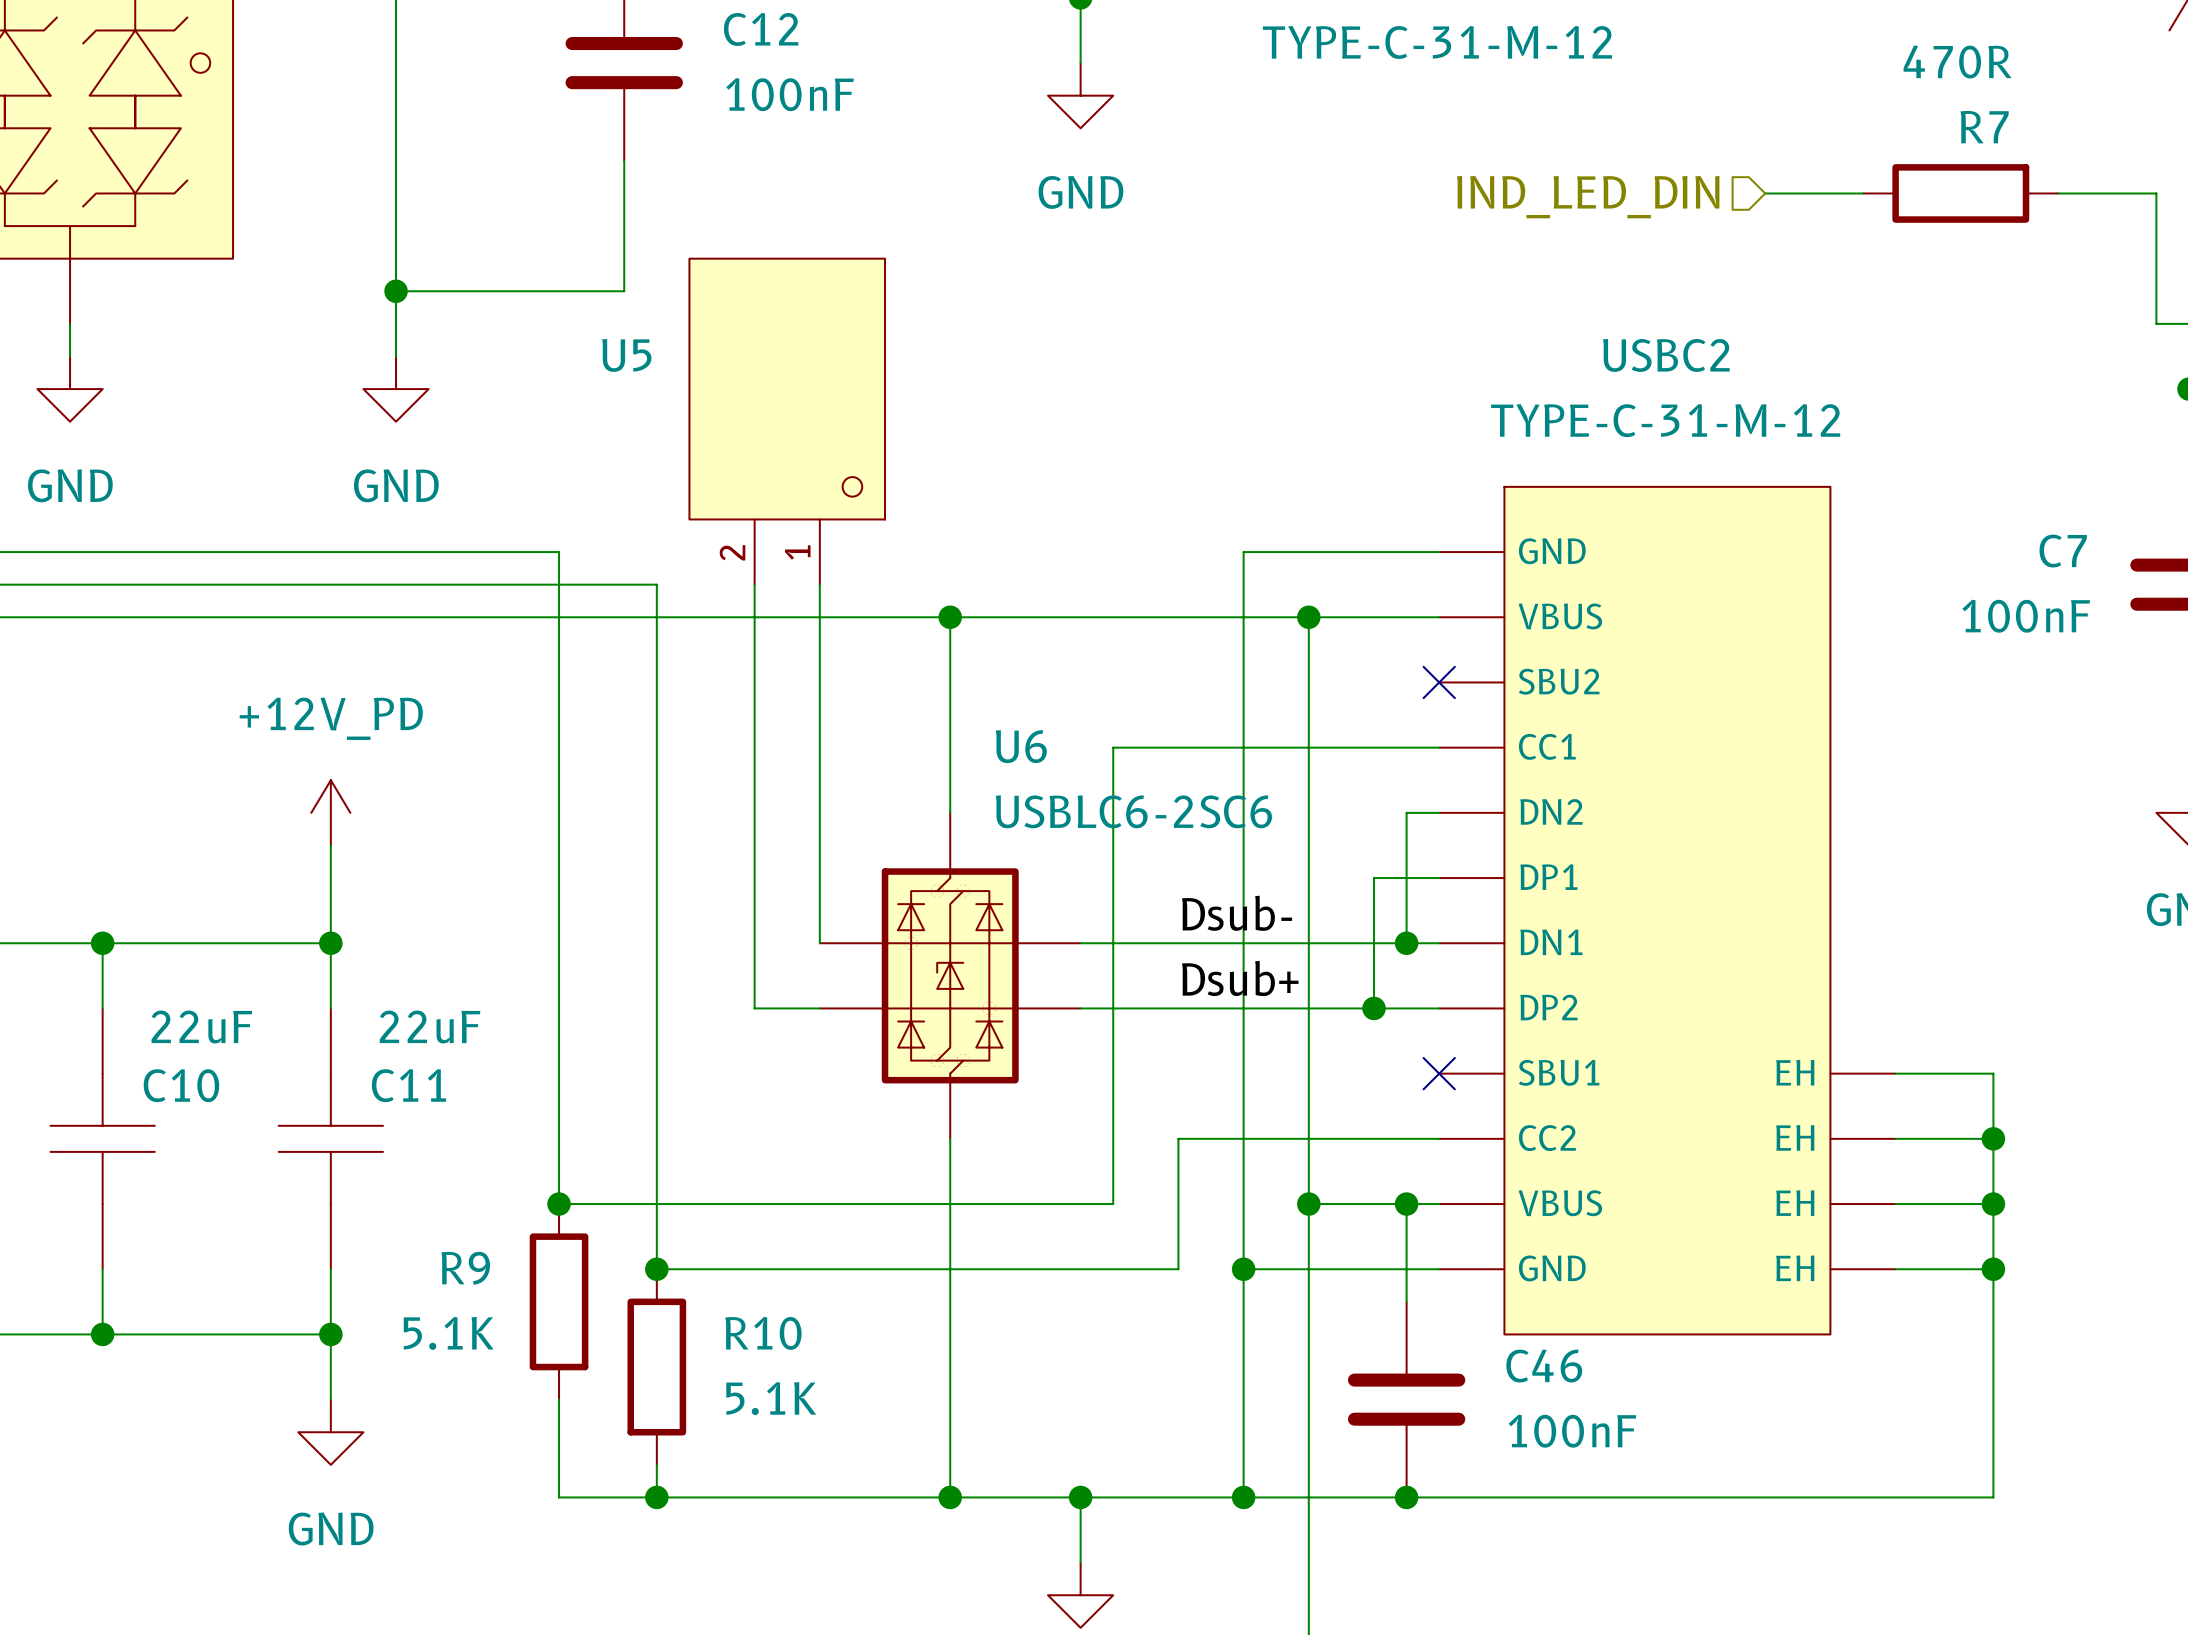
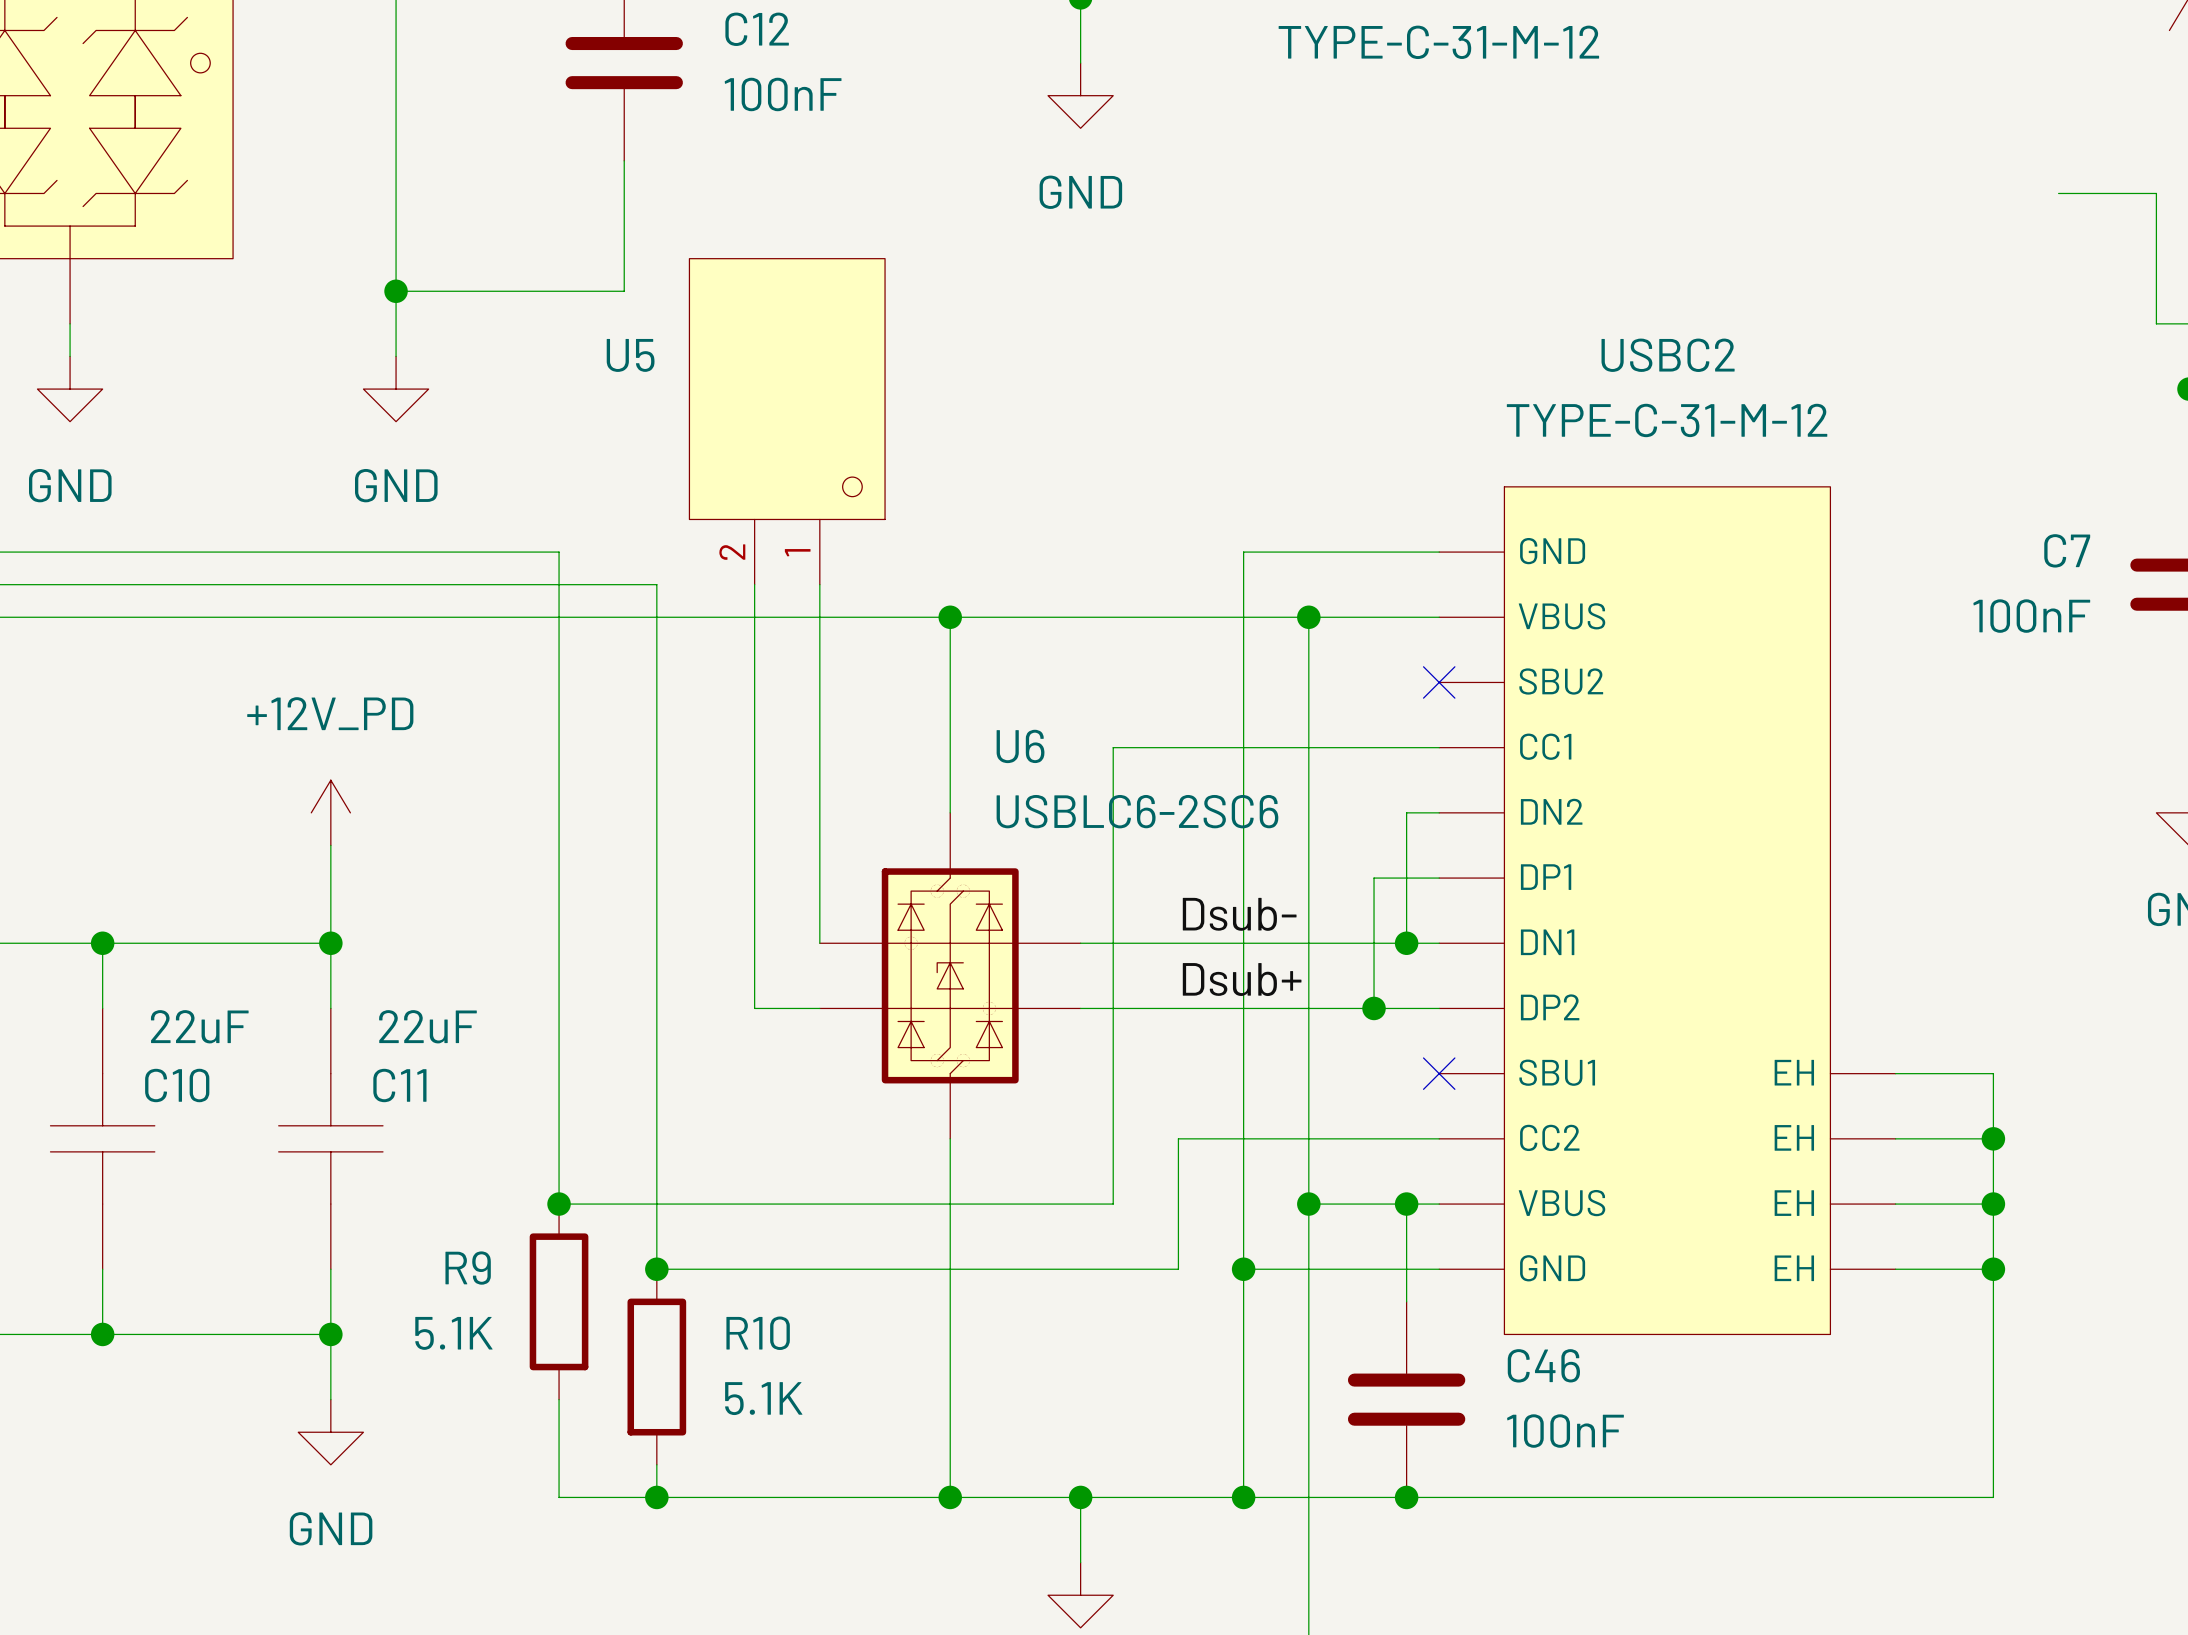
wire: (1765, 193) (1863, 193) -> none
R7: 470R (1960, 193) -> none
hierarchical label: IND_LED_DIN (1588, 197) -> none

